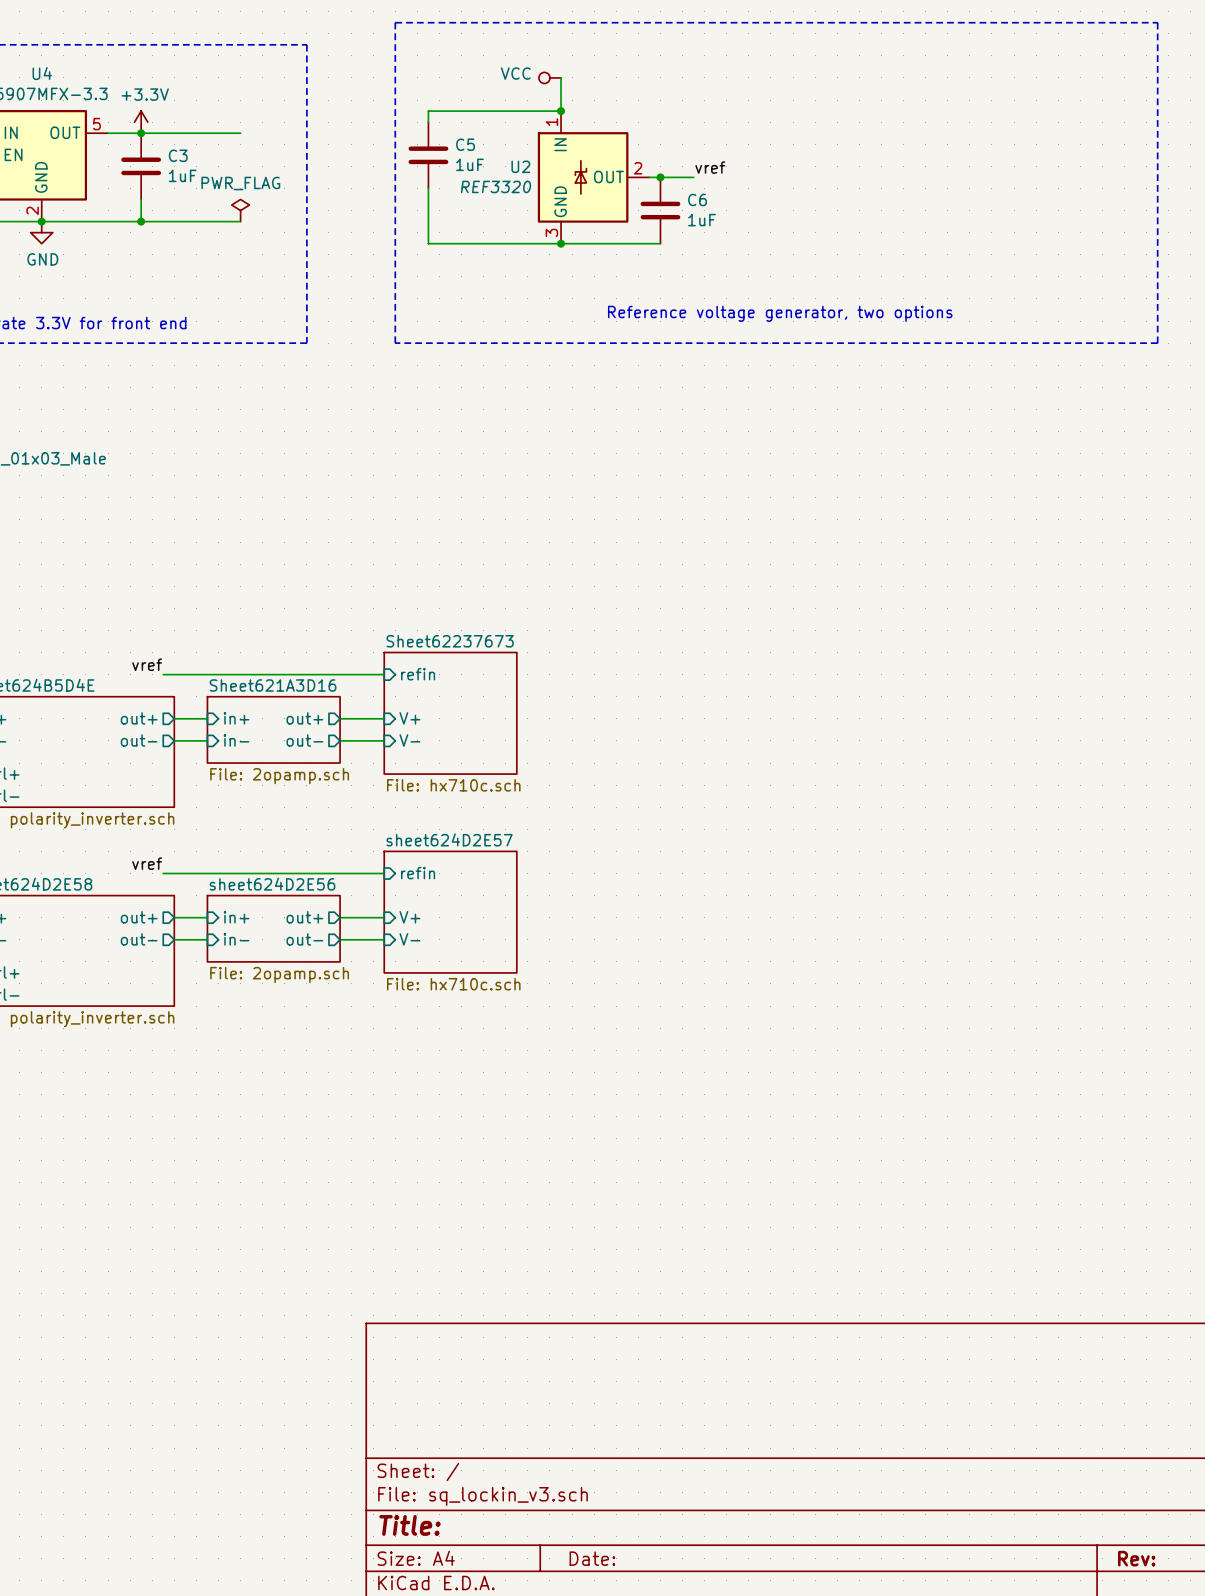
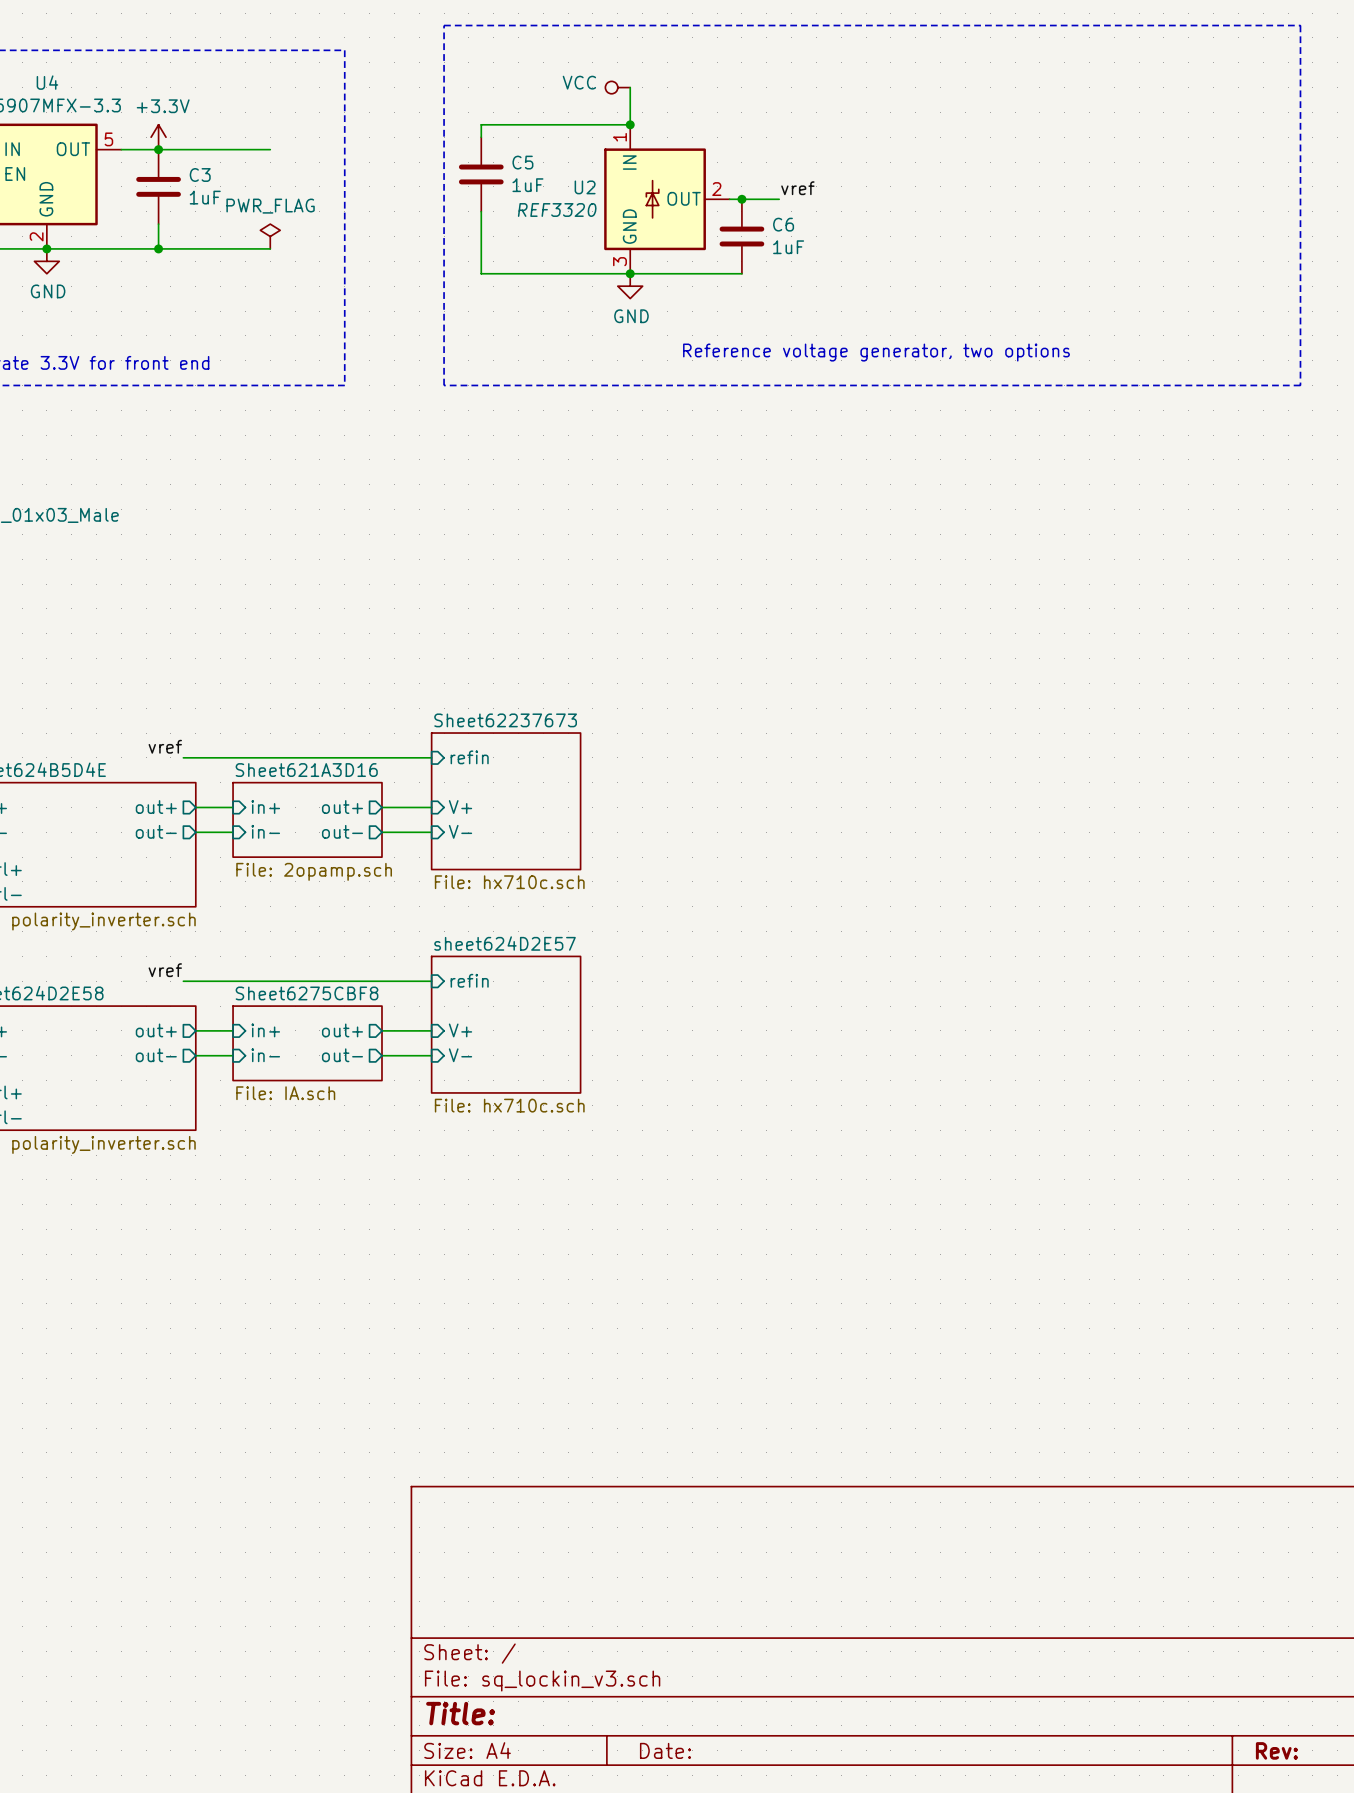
power symbol: none -> GND (630, 286)
sheet sheet624D2E56 name: sheet624D2E56 (272, 884) -> Sheet6275CBF8 (307, 993)
sheet sheet624D2E56 value: File: 2opamp.sch (279, 975) -> File: IA.sch (285, 1093)

